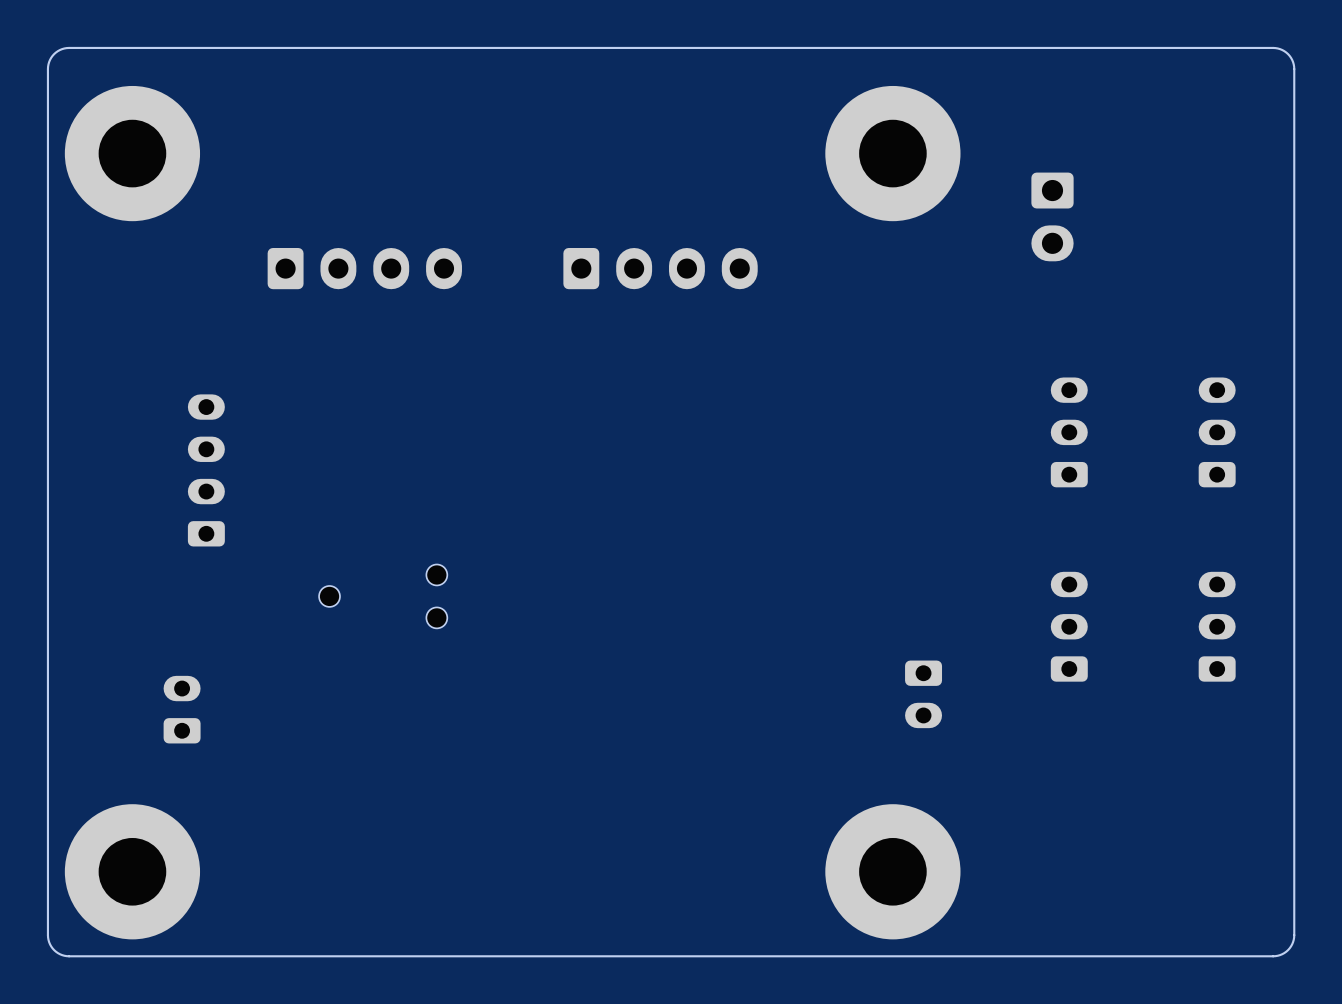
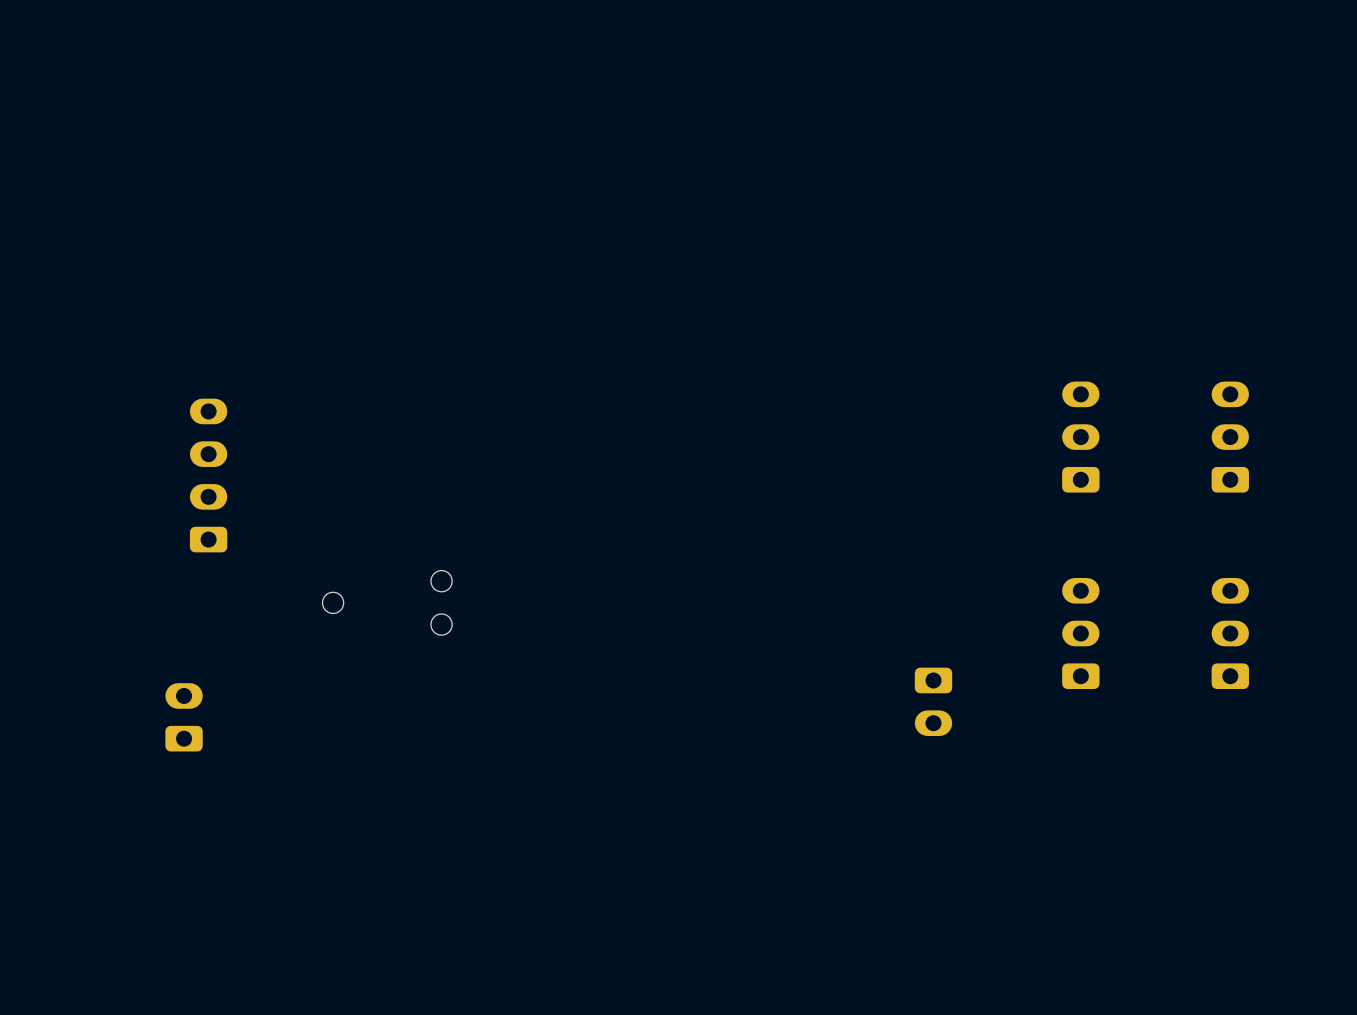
board edge: (1273, 47) (69, 47) (55, 52) (50, 59) (47, 69) (47, 935) (52, 948) (59, 954) (69, 956) (1273, 956) (1286, 951) (1292, 944) (1294, 935) (1294, 69) (1293, 62) (1288, 54) (1282, 50) (1273, 47) -> none
part: (132, 153) -> none
part: (892, 153) -> none
part: (1052, 216) -> none
part: (364, 268) -> none
part: (660, 268) -> none
part: (132, 871) -> none
part: (892, 871) -> none

